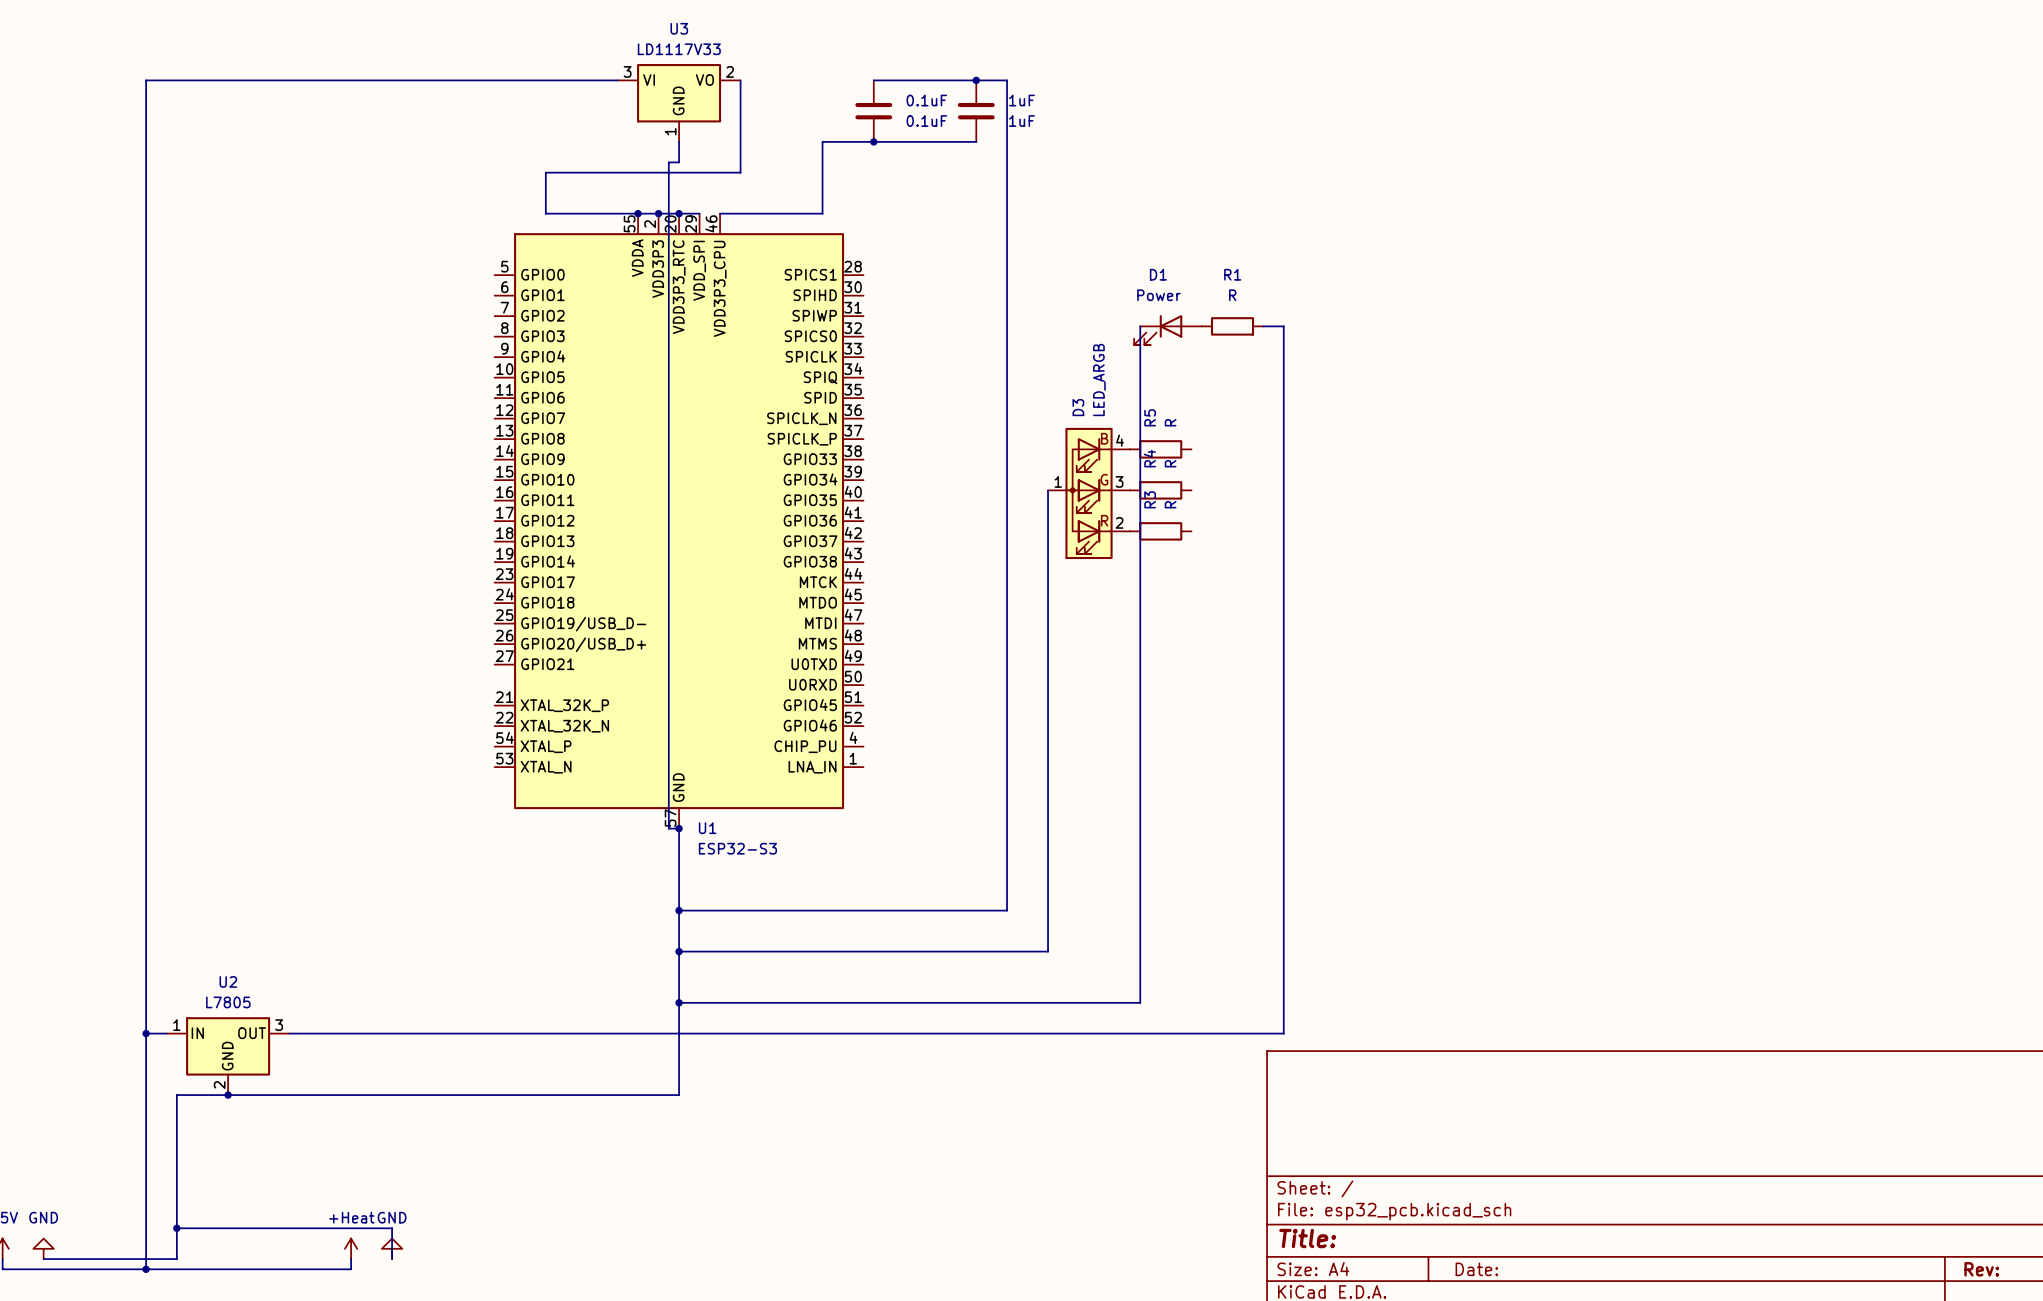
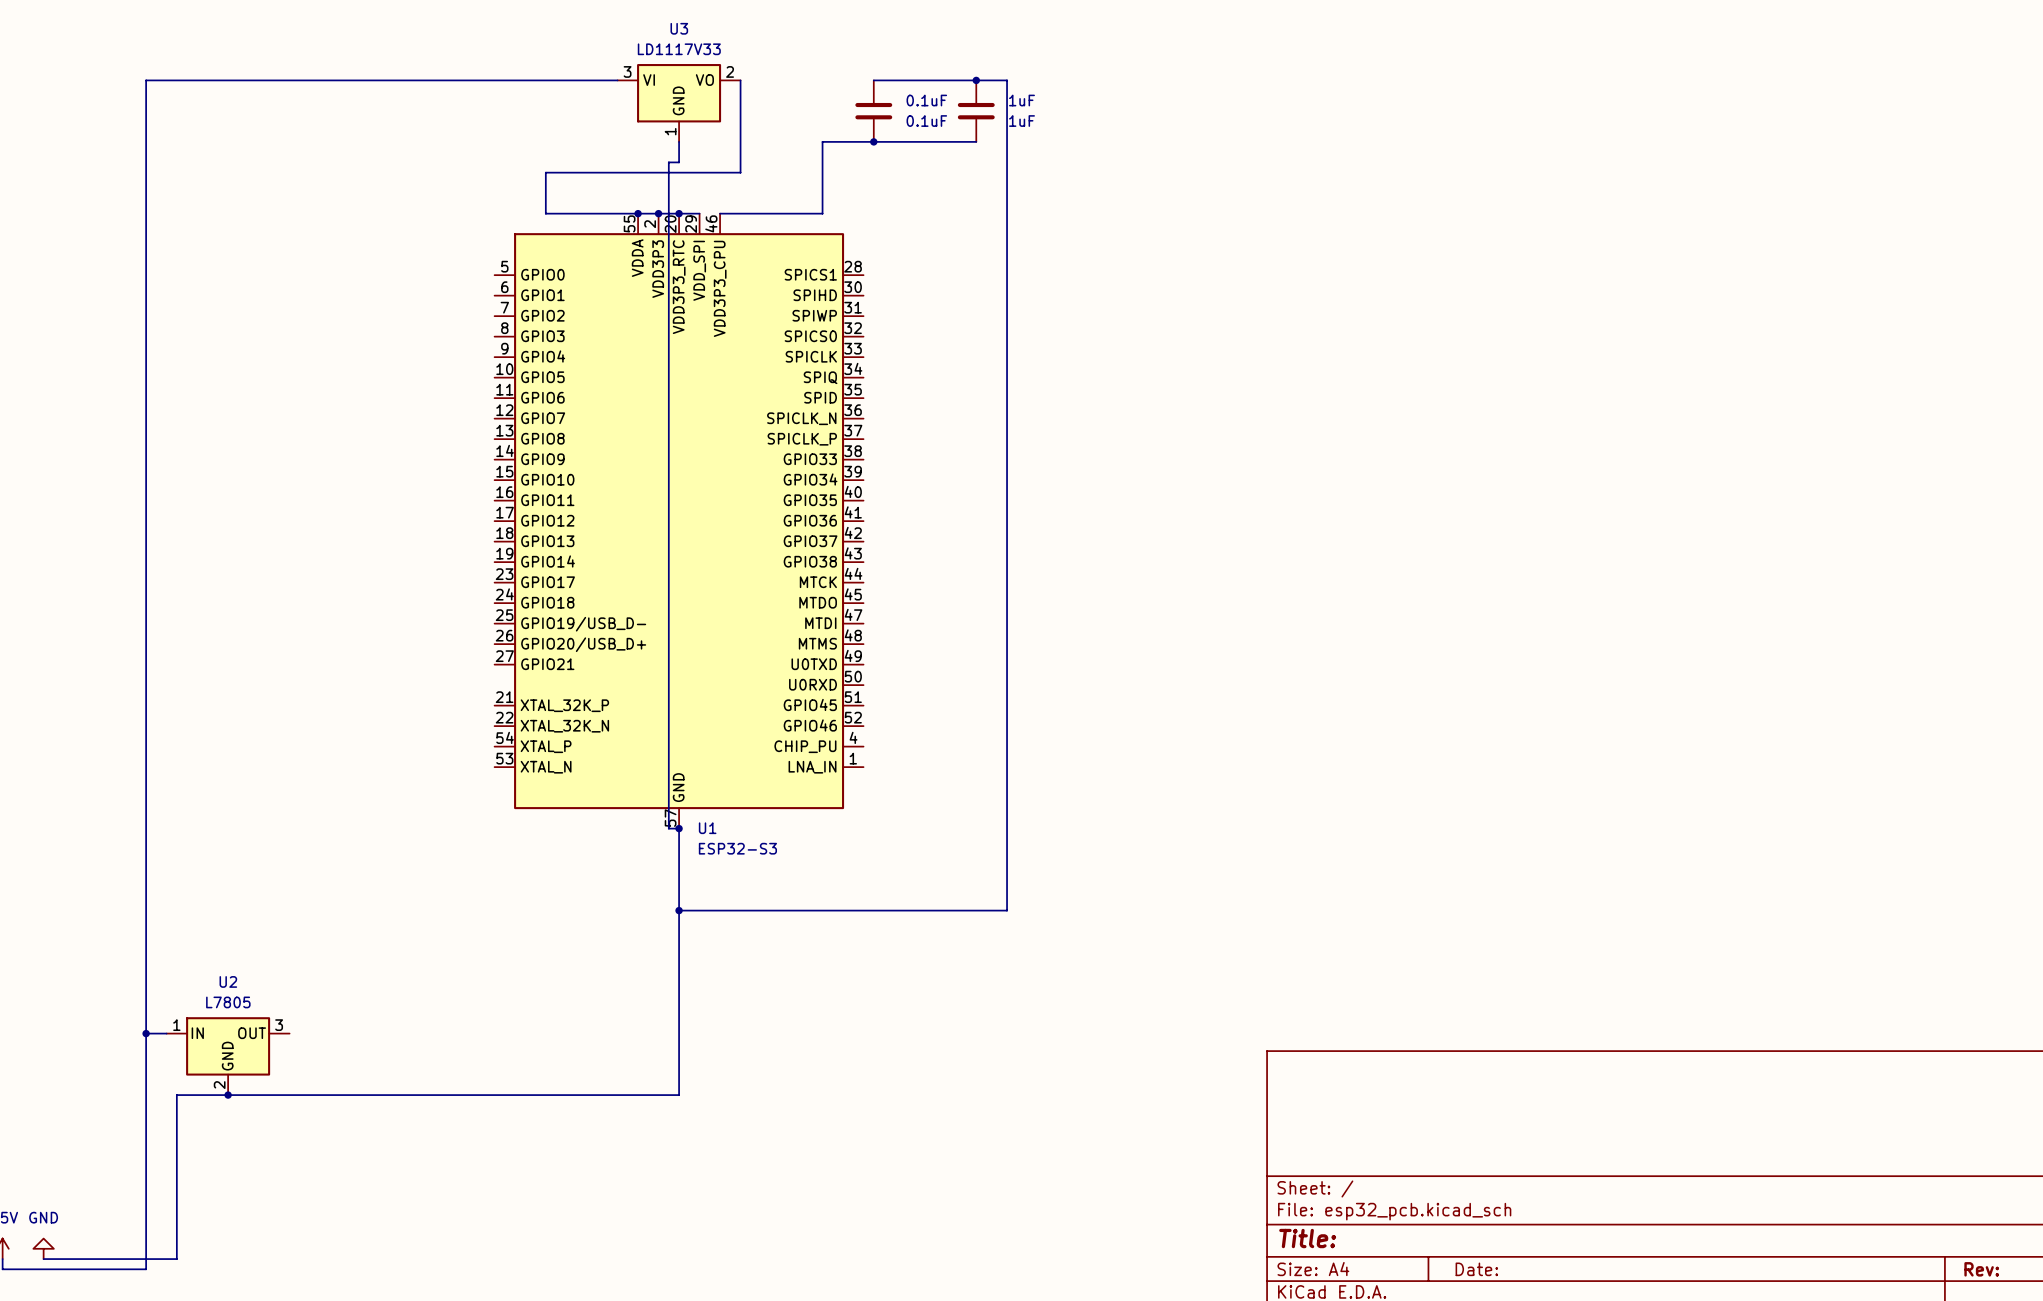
wire: (1140, 326) (1140, 1002) (679, 1002) -> none
R1: R (1232, 326) -> none
wire: (1263, 326) (1283, 326) (1283, 1033) (289, 1033) -> none
D1: Power (1167, 329) -> none
R5: R (1160, 449) -> none
wire: (1048, 490) (1048, 951) (679, 951) -> none
R4: R (1160, 490) -> none
D3: LED_ARGB (1089, 493) -> none
R3: R (1160, 531) -> none
junction: (679, 951) -> none
junction: (679, 1002) -> none
wire: (176, 1228) (392, 1228) (392, 1259) -> none
junction: (176, 1228) -> none
power symbol: +Heat (351, 1248) -> none
power symbol: GND (392, 1248) -> none
wire: (351, 1259) (351, 1269) (146, 1269) -> none
junction: (146, 1269) -> none

